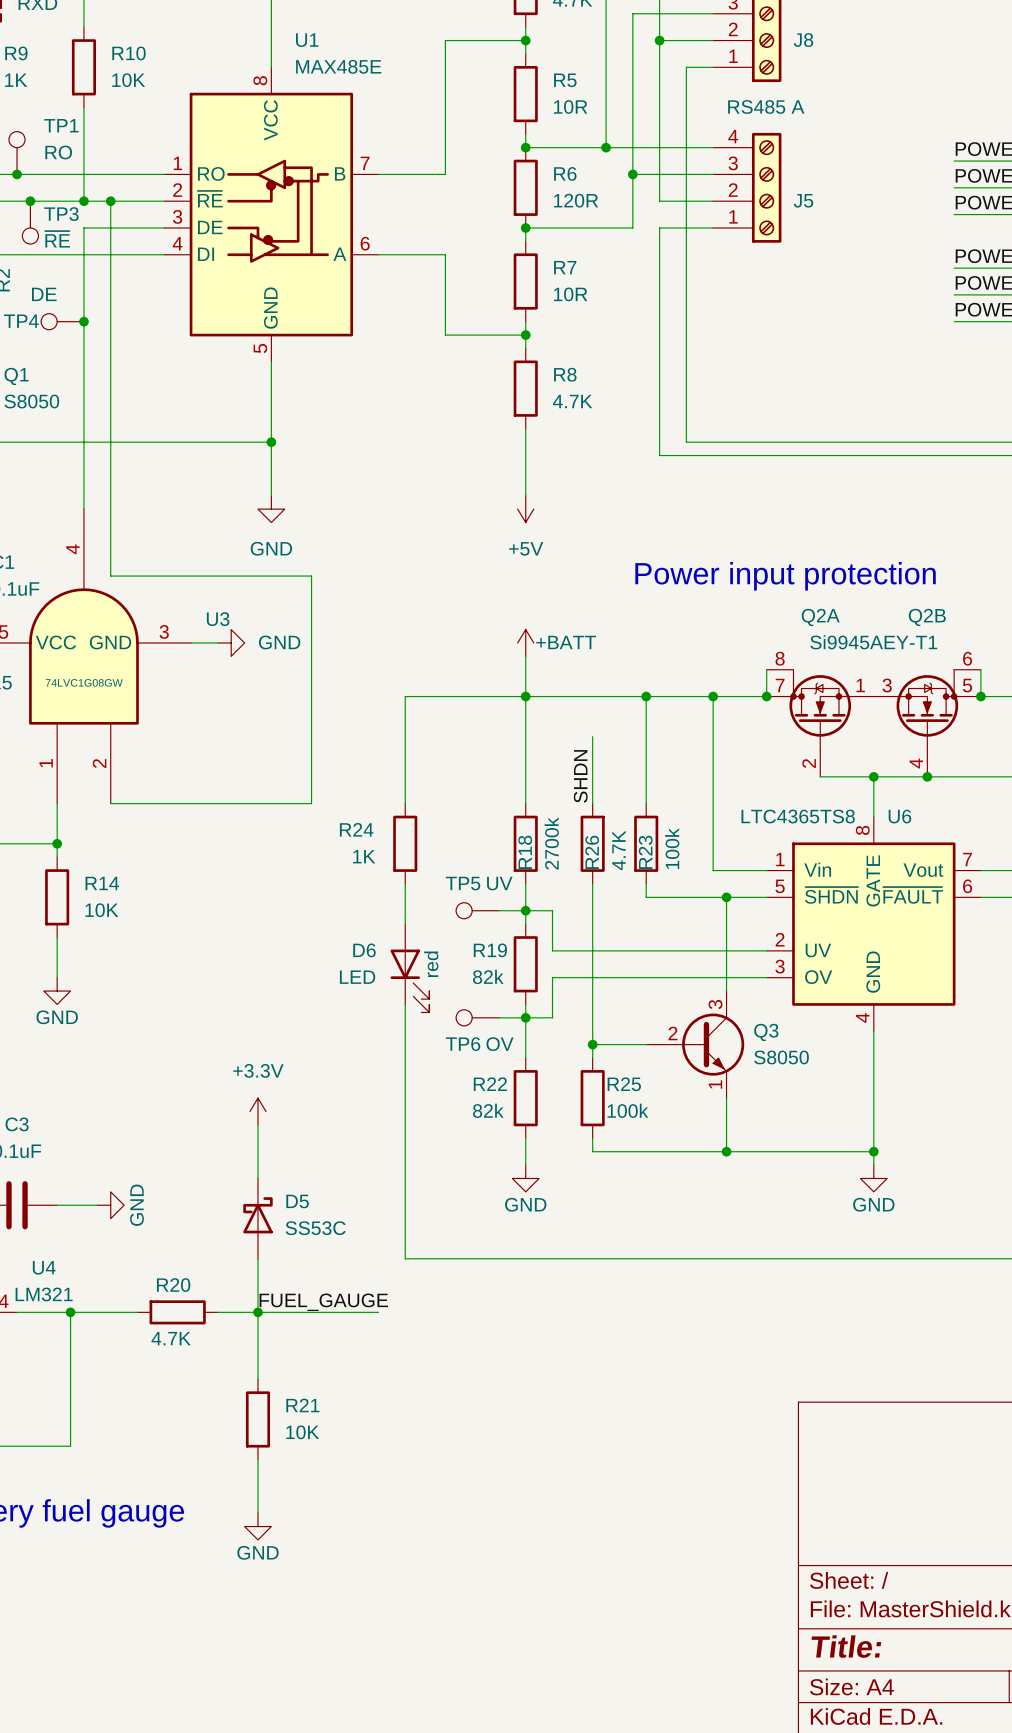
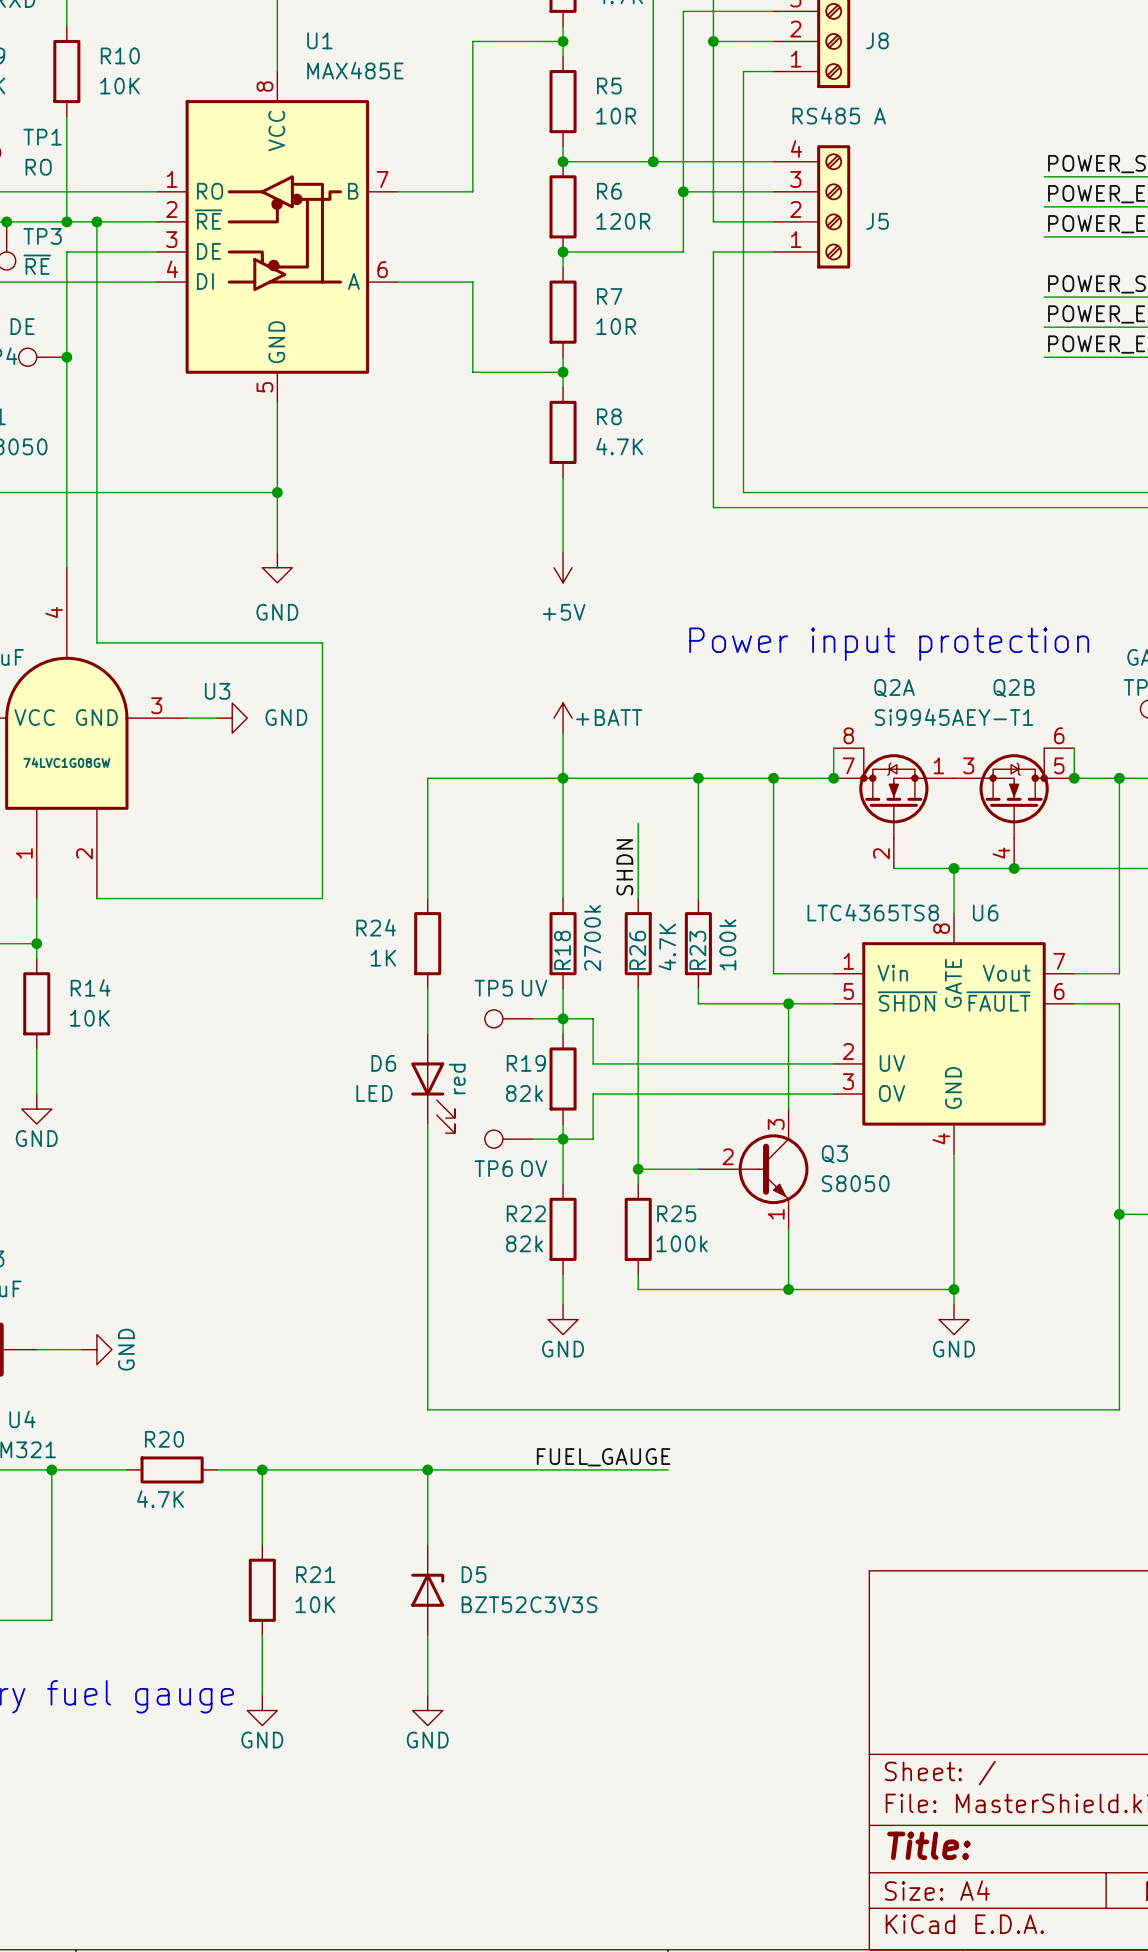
power symbol: +3.3V (257, 1111) -> none
wire: (257, 1124) (257, 1178) -> none
D5 symbol: [243, 1178, 273, 1259] -> [411, 1545, 445, 1636]
D5 value: SS53C (315, 1228) -> BZT52C3V3S (529, 1604)
wire: (257, 1258) (257, 1312) -> (427, 1635) (427, 1695)
label position: FUEL_GAUGE (323, 1302) -> FUEL_GAUGE (603, 1457)
wire: none -> (397, 1469) (668, 1469)
wire: none -> (427, 1469) (427, 1545)
junction: none -> (427, 1469)
power symbol: none -> GND (427, 1710)

